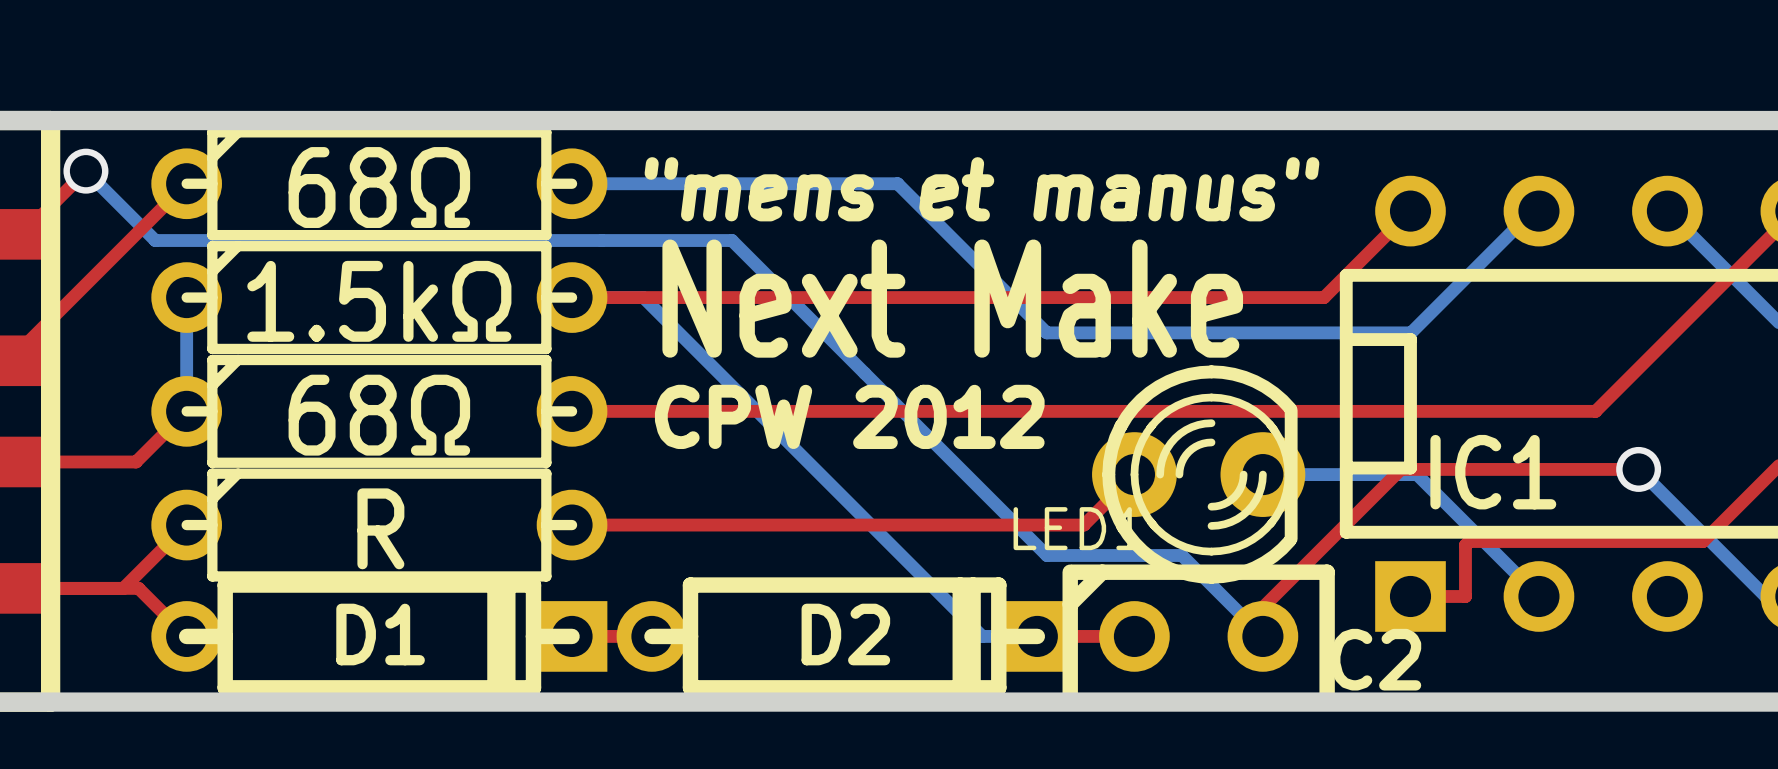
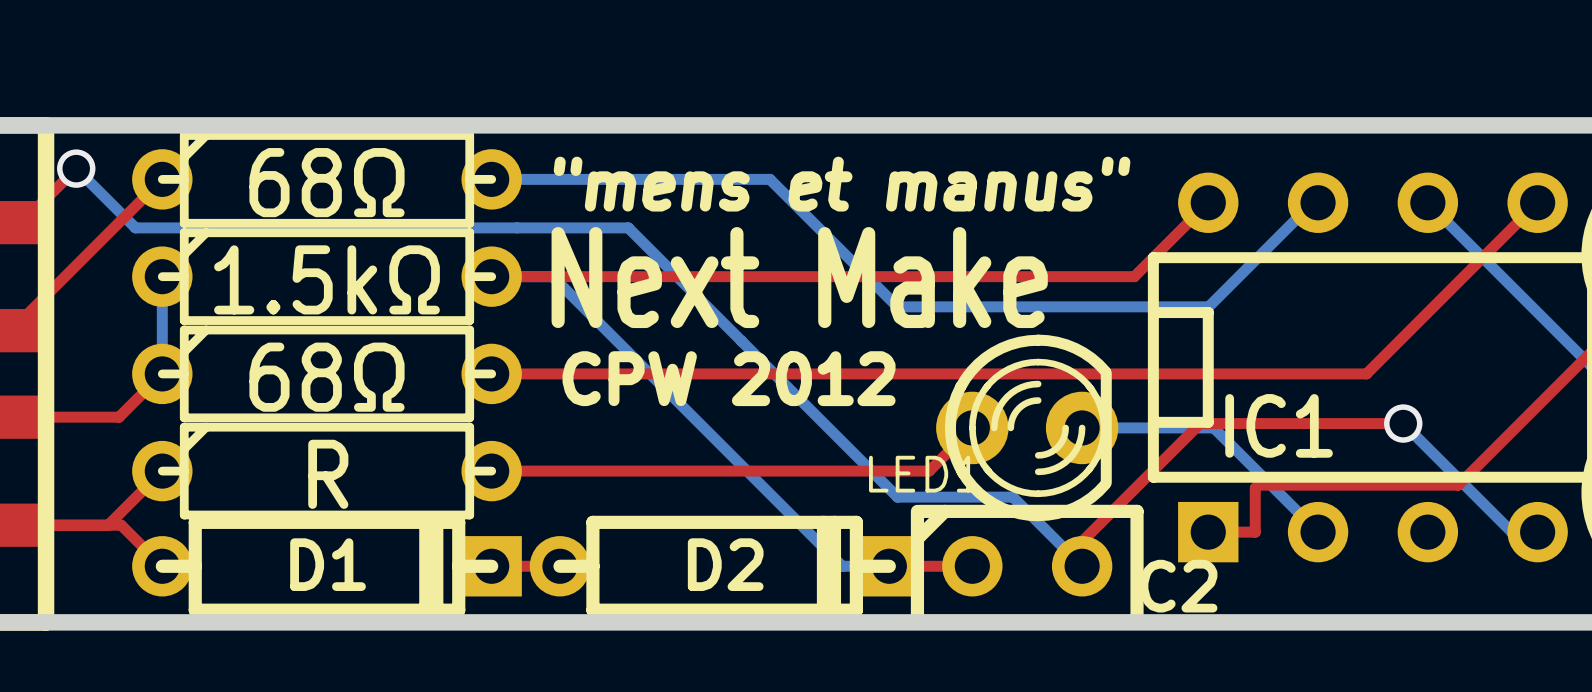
text position: Next Make (952, 298) -> Next Make (799, 277)

